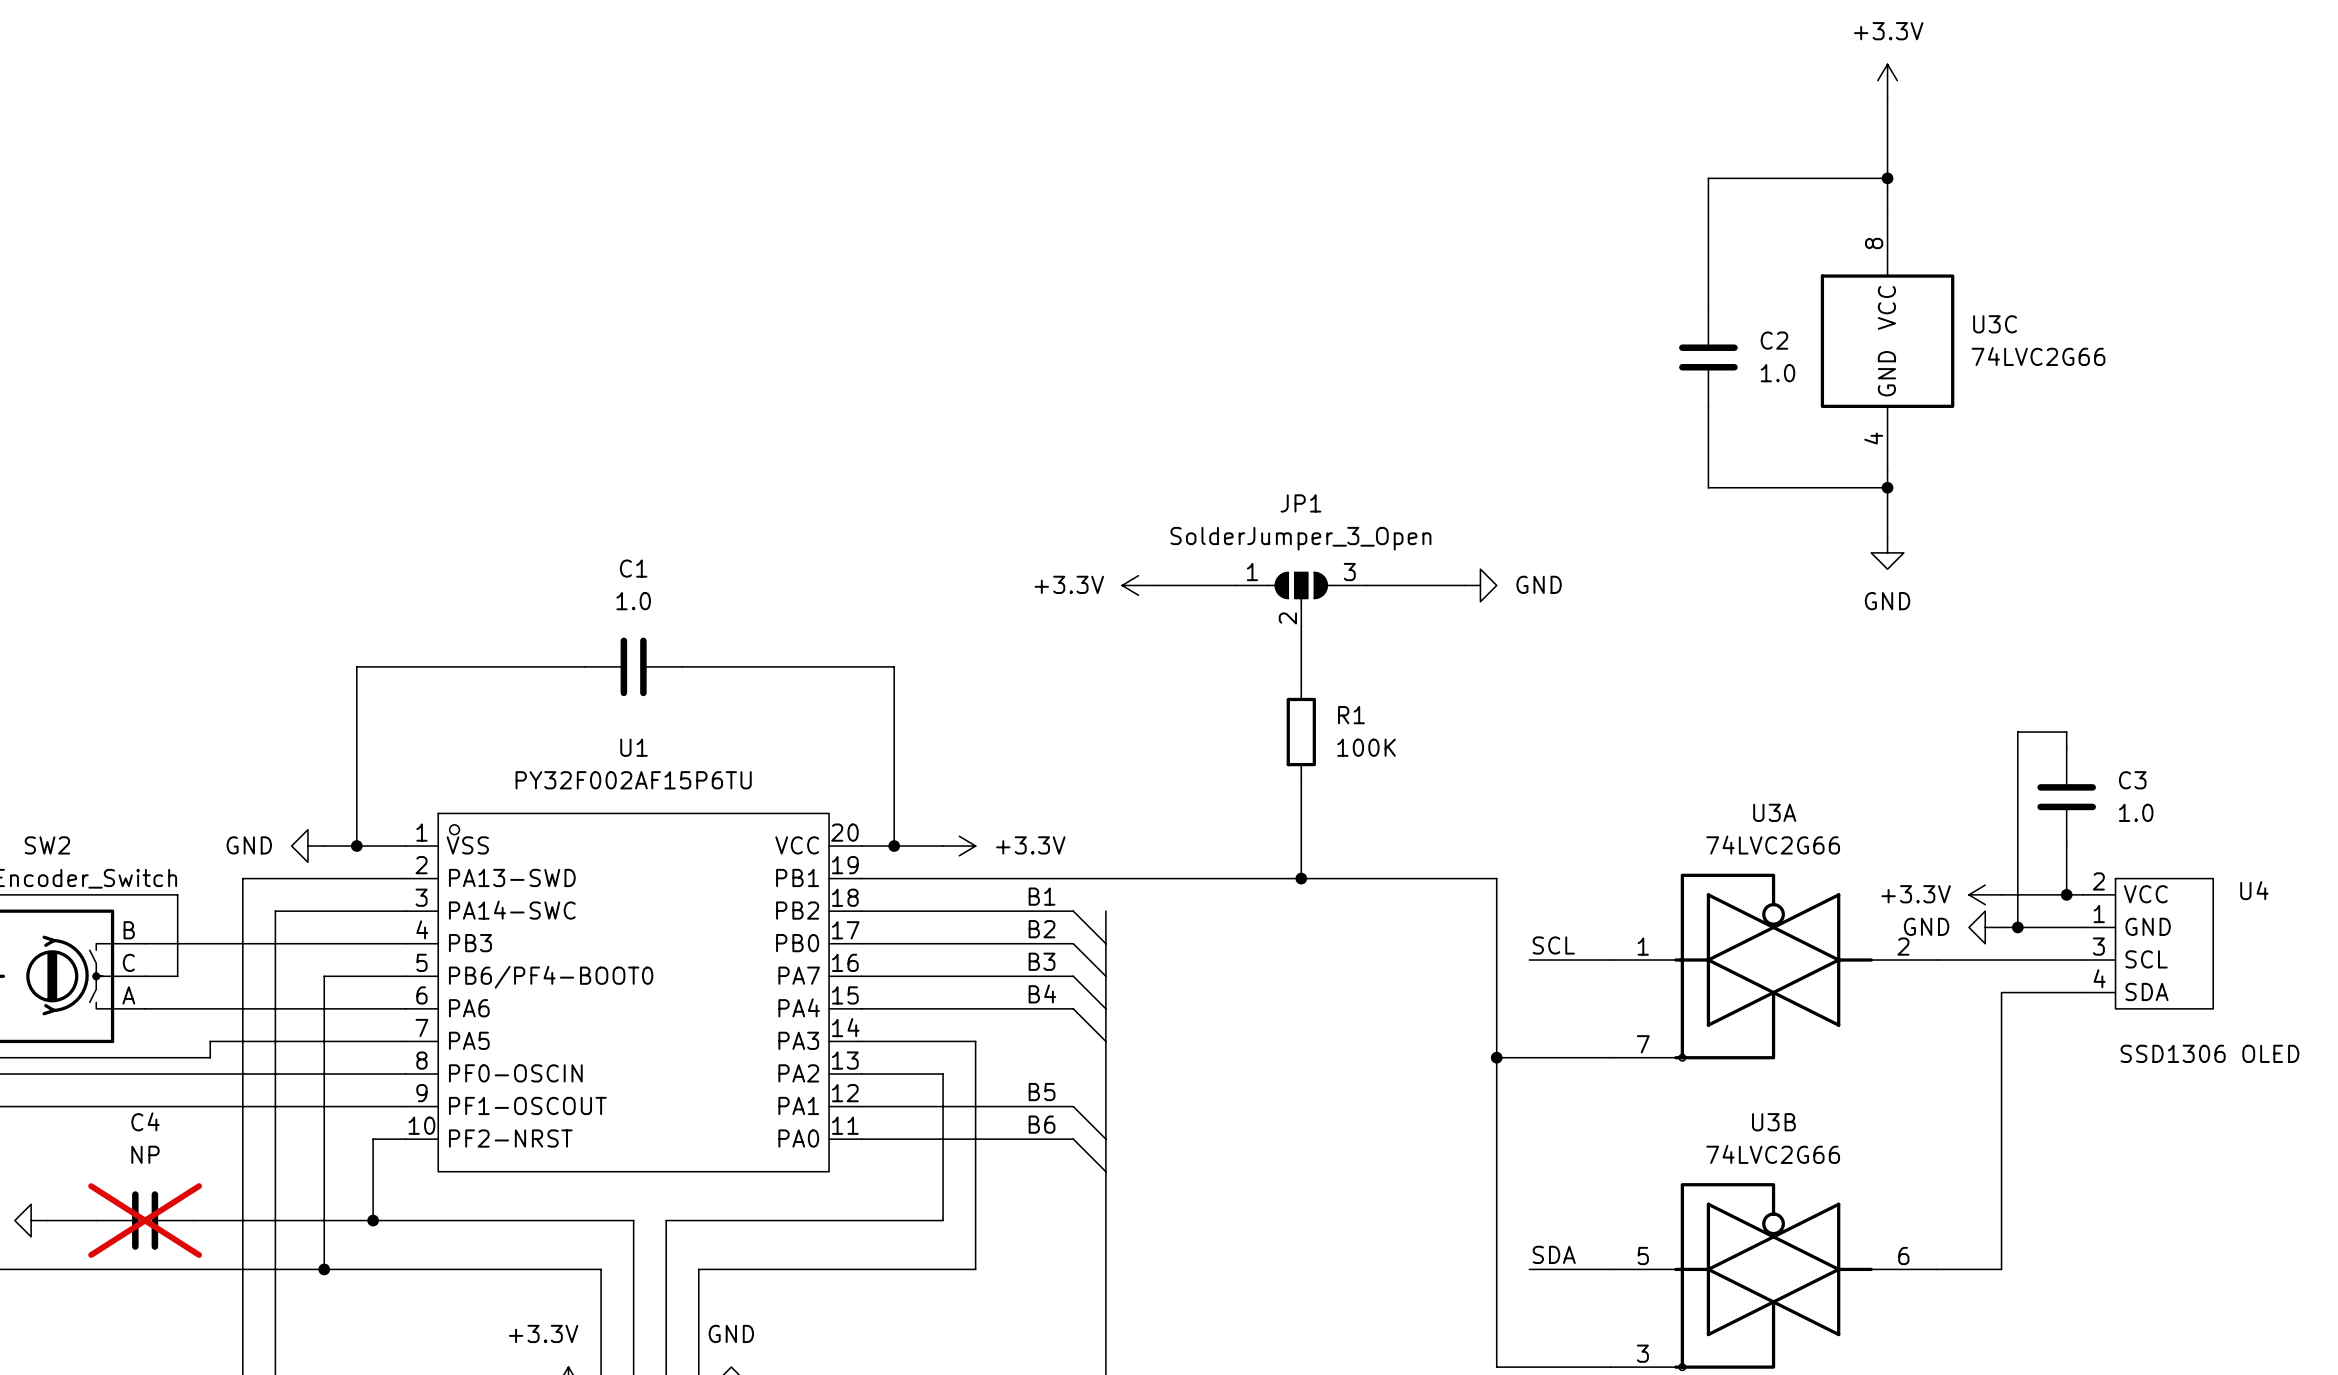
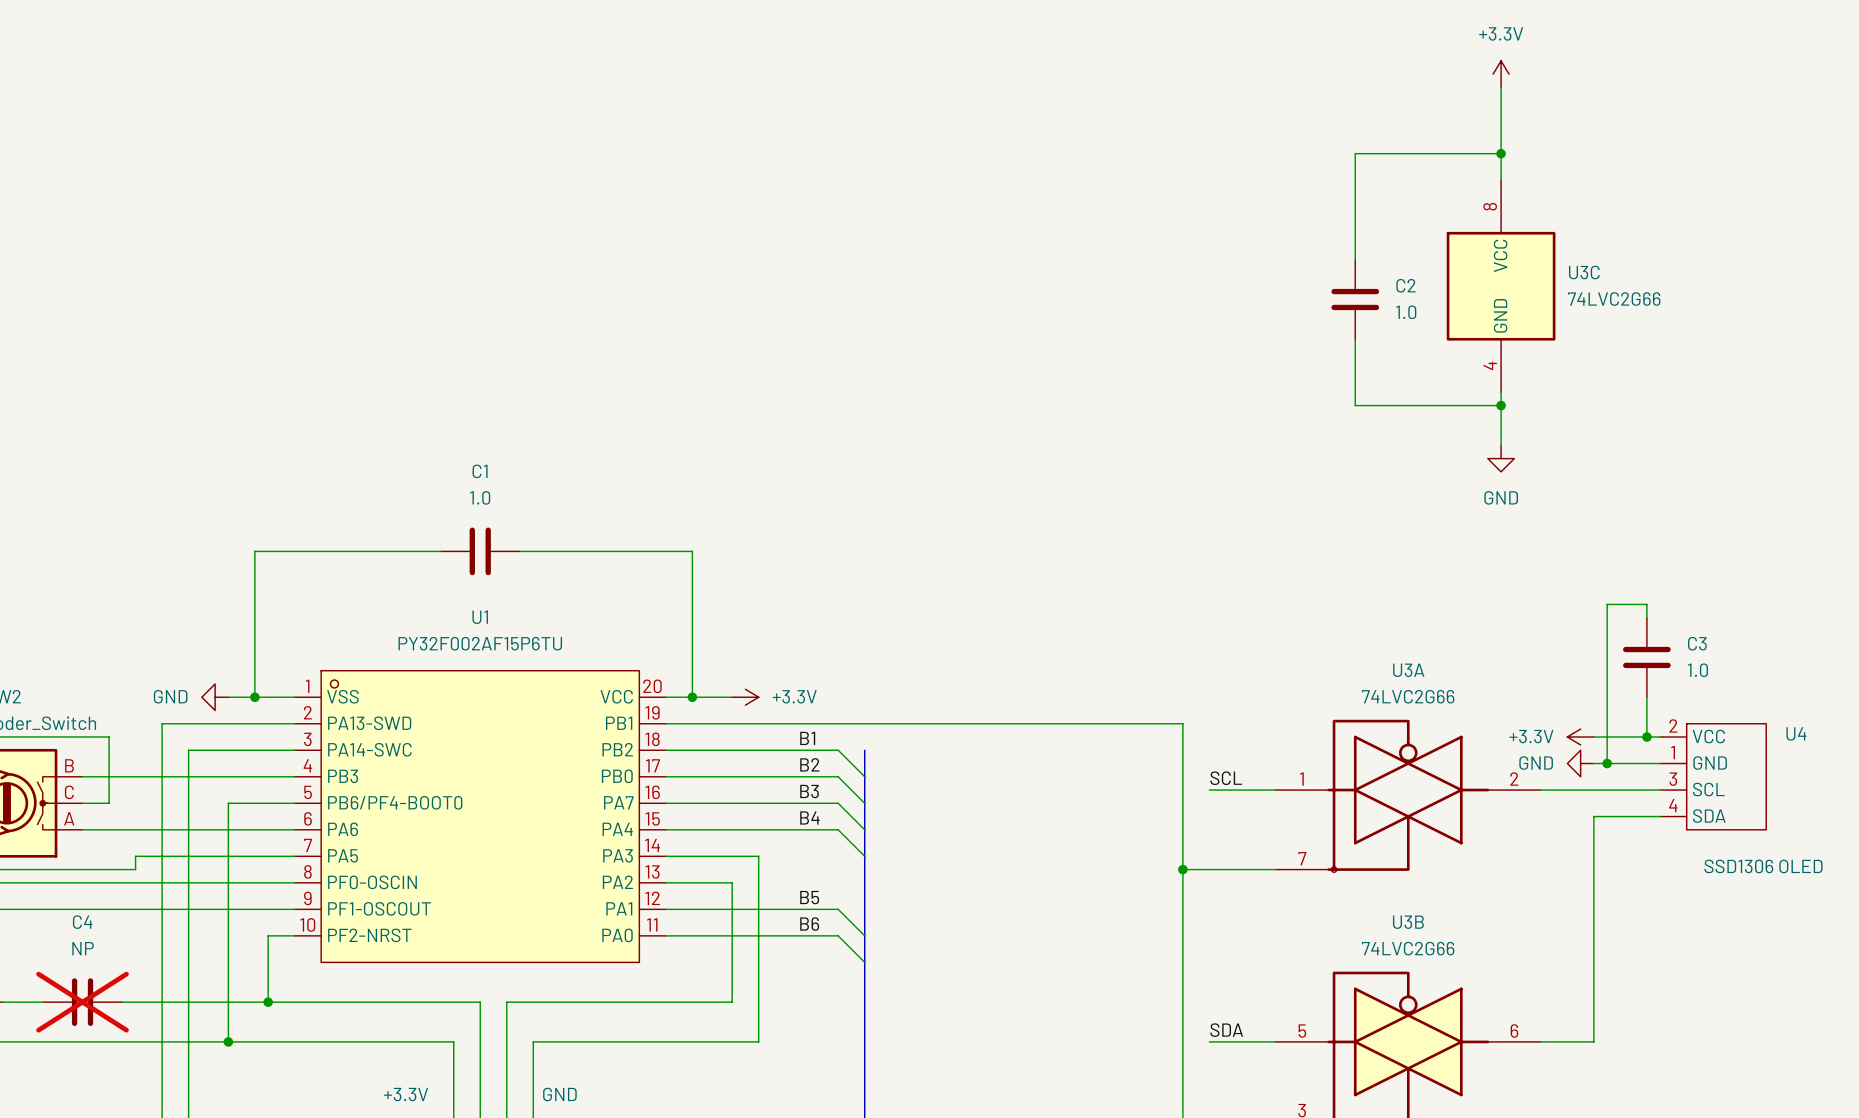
power symbol: +3.3V (1138, 585) -> none
wire: (1154, 585) (1236, 585) -> none
wire: (1366, 585) (1464, 585) -> none
power symbol: GND (1480, 585) -> none
JP1: SolderJumper_3_Open (1301, 603) -> none
wire: (1301, 634) (1301, 683) -> none
R1: 100K (1301, 732) -> none
wire: (1301, 780) (1301, 878) -> none
junction: (1301, 878) -> none

